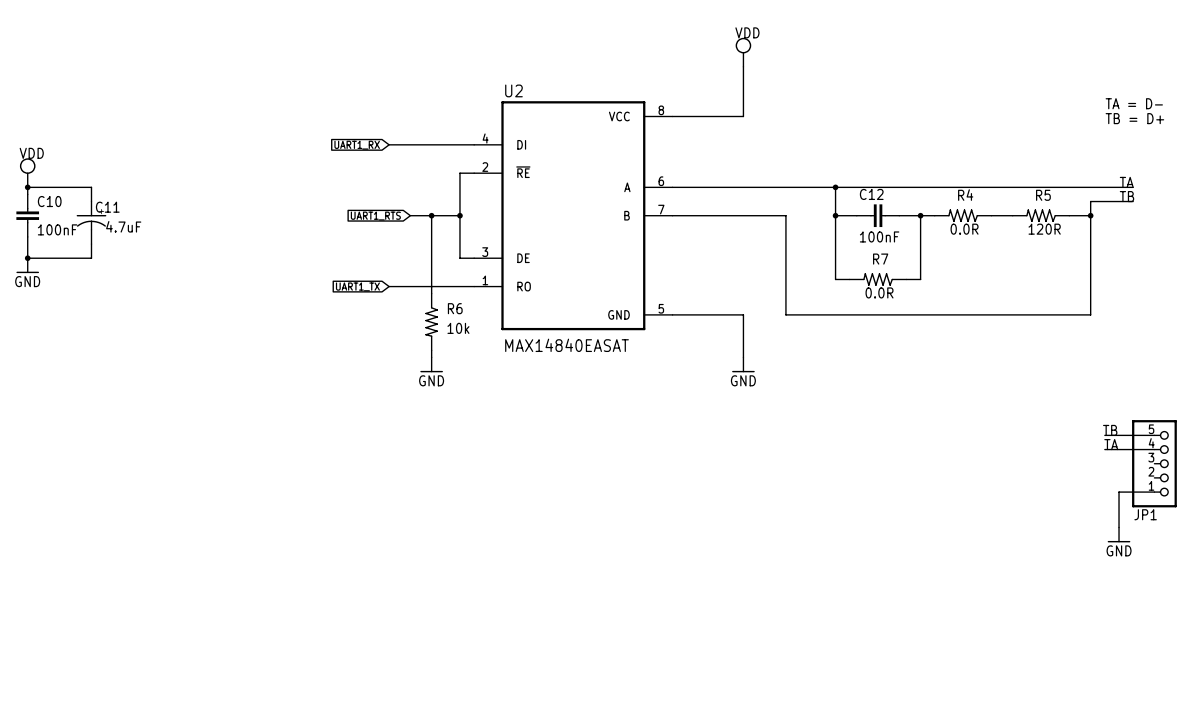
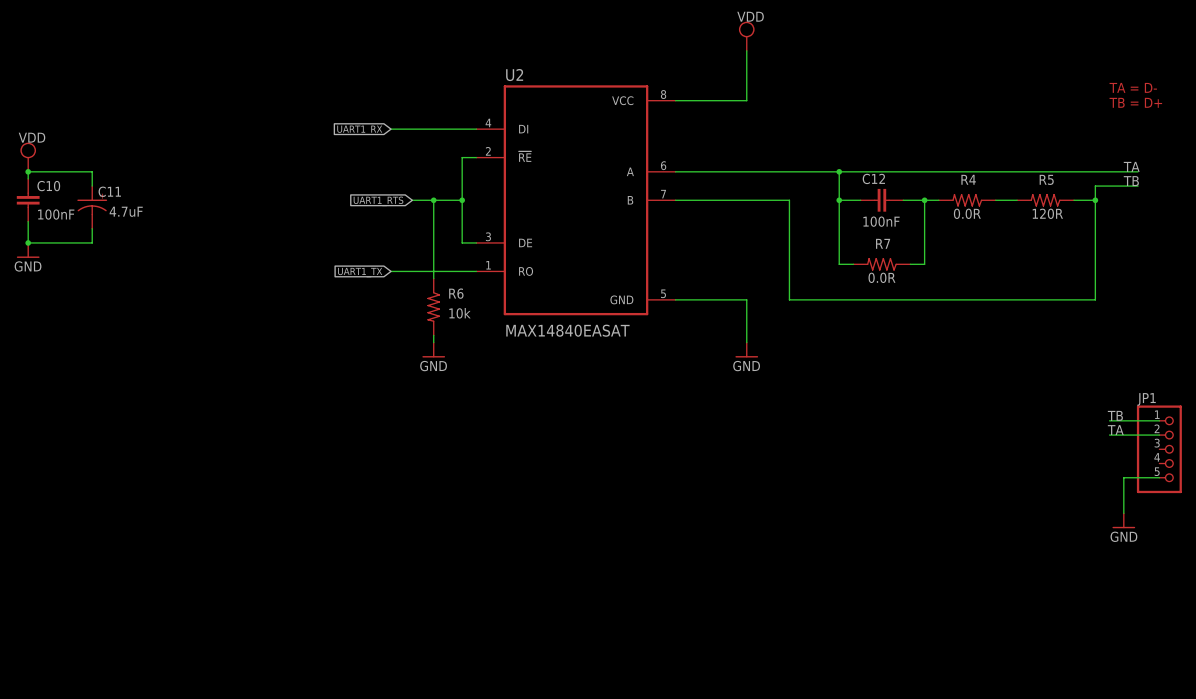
JP1 flip: as is (1154, 463) -> up-down (1159, 449)

